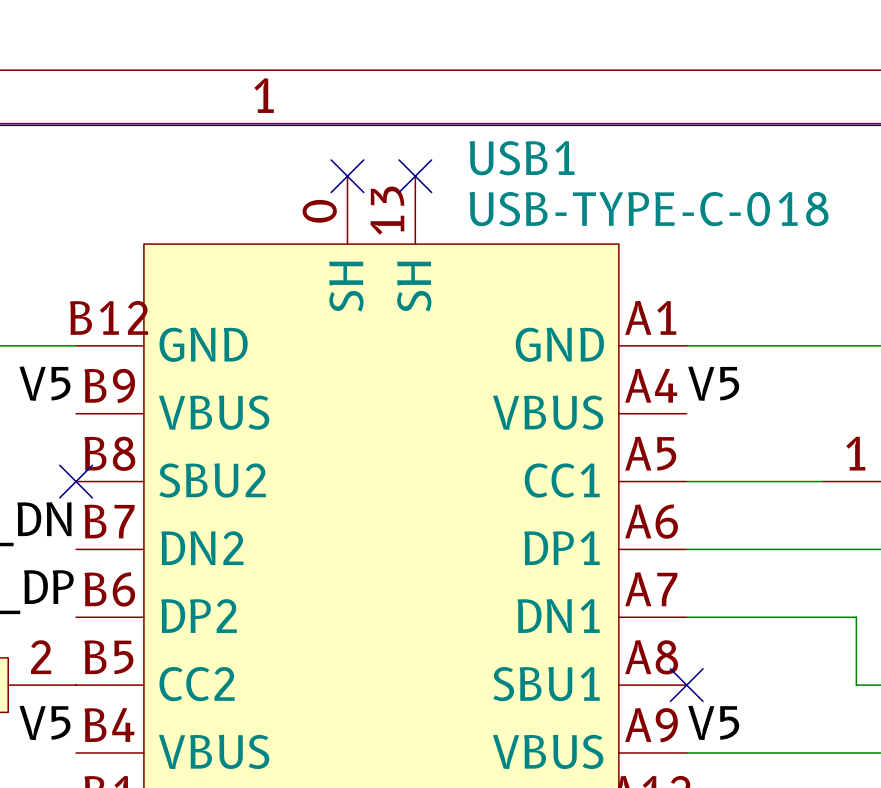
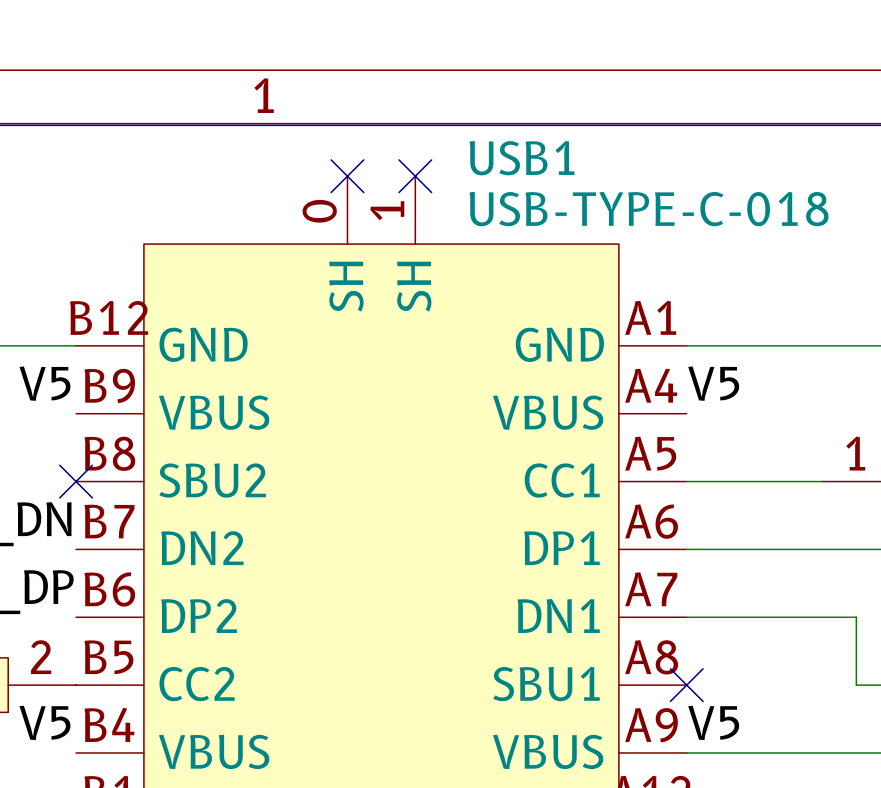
USB1 pin number: 13 (387, 210) -> 1 (387, 210)

